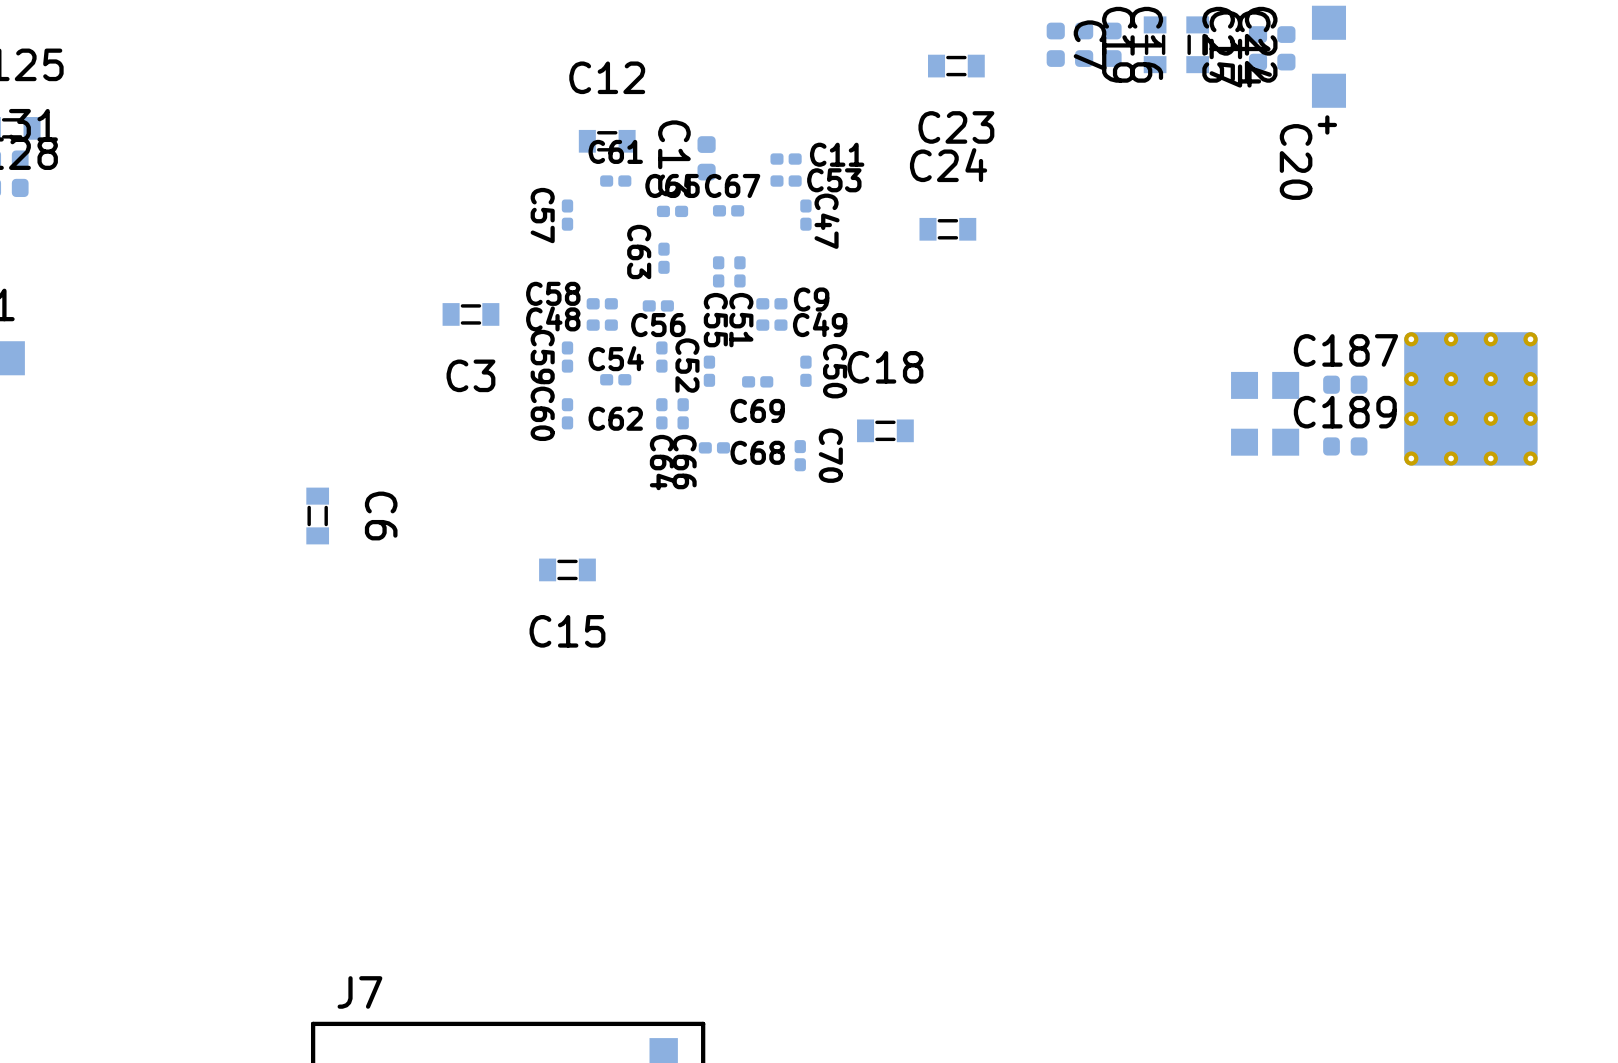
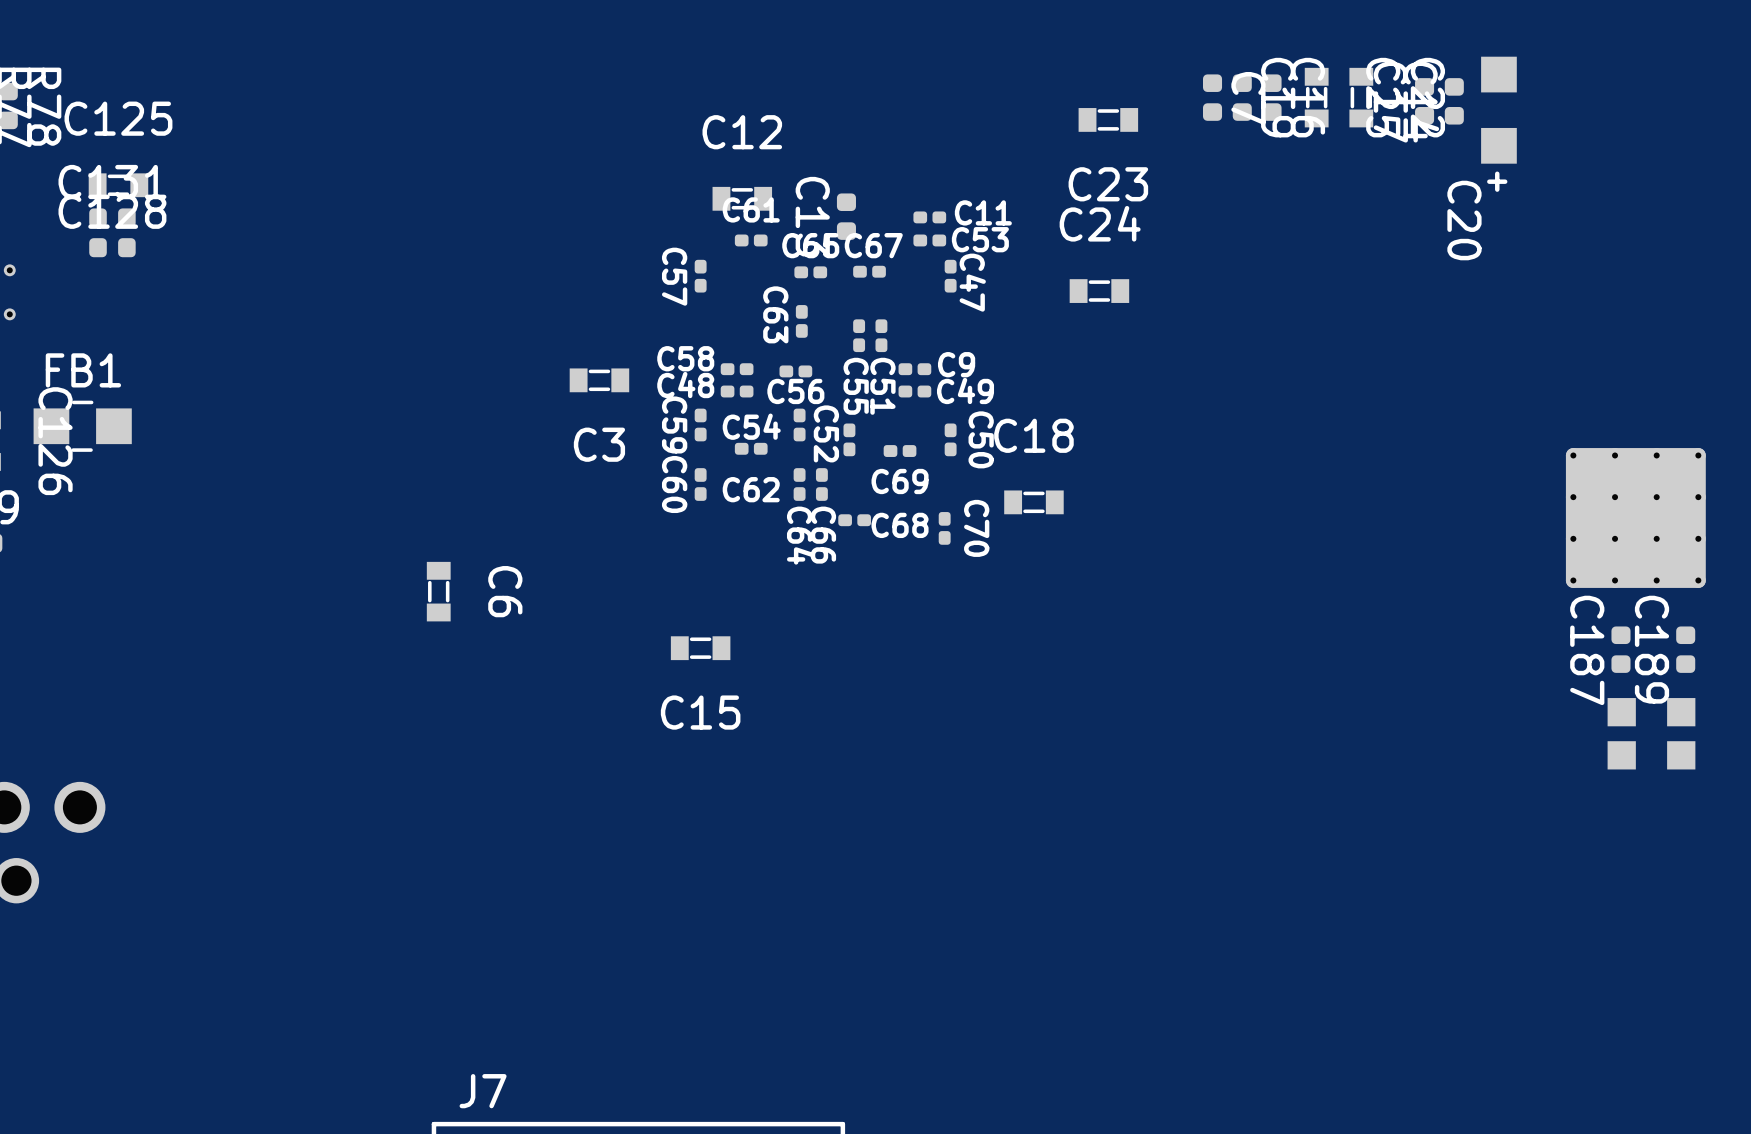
C187 rotation: 0° (1345, 384) -> 90° clockwise (1620, 649)
C187 position: (1345, 384) -> (1620, 649)
part: (1265, 385) -> none
part position: (1470, 398) -> (1635, 517)
part: (1265, 442) -> none
C189 rotation: 0° (1345, 446) -> 90° clockwise (1685, 649)
C189 position: (1345, 446) -> (1685, 649)
part: none -> (1621, 733)
part: none -> (1681, 733)

